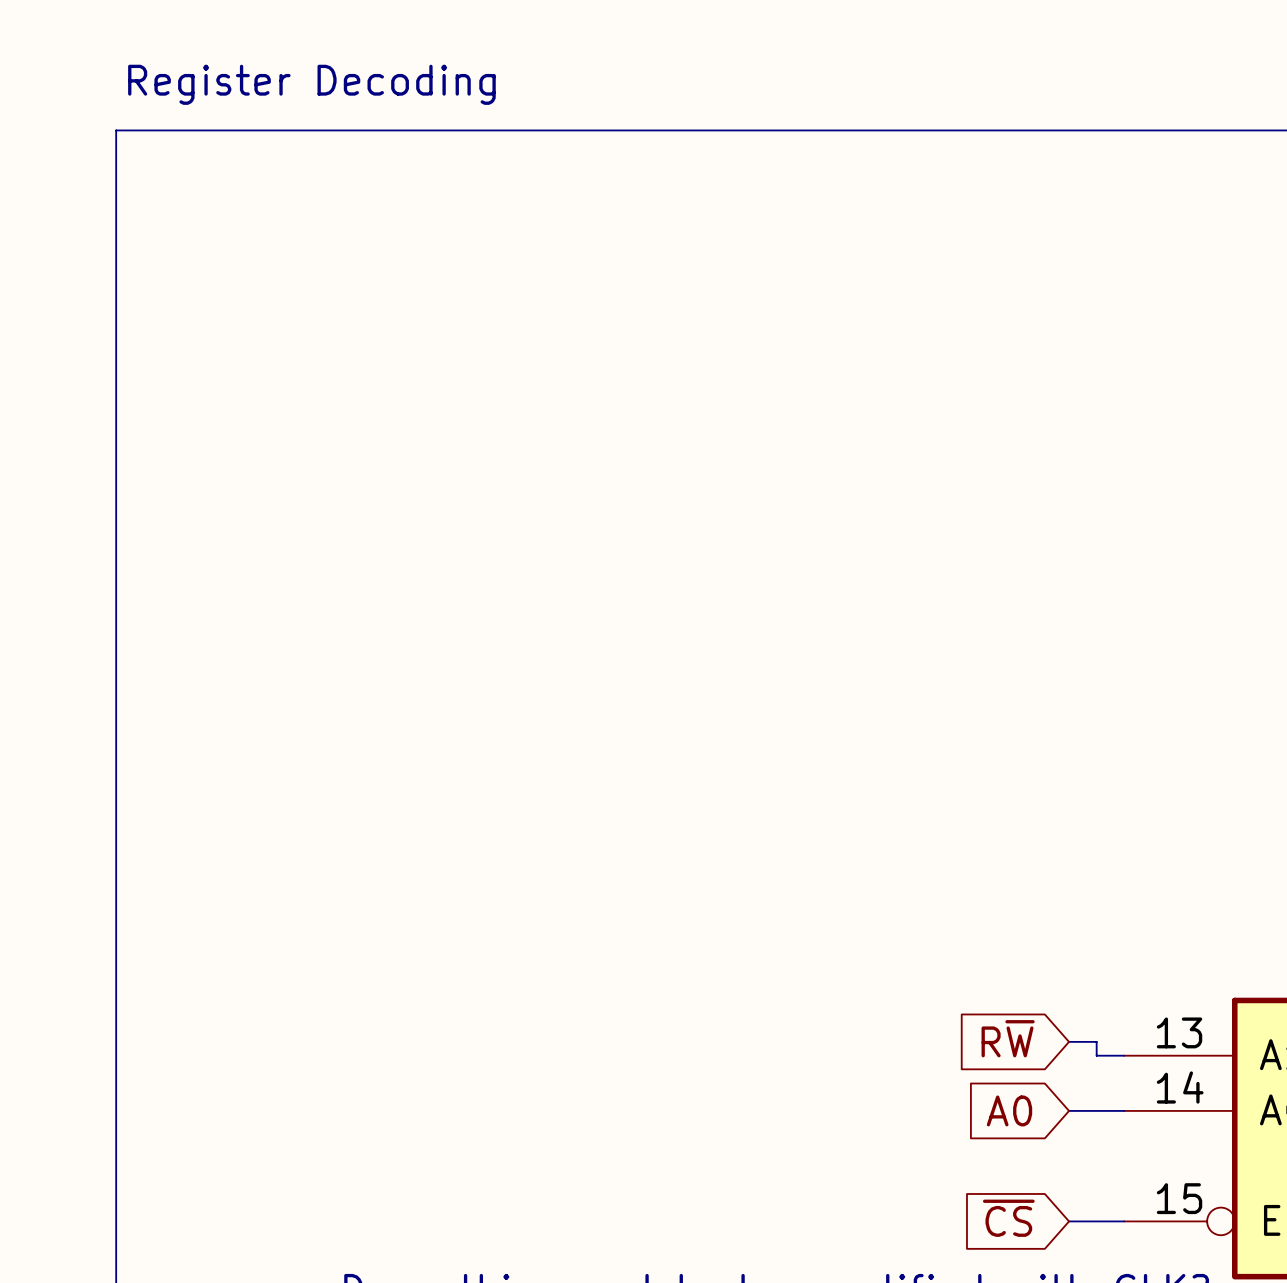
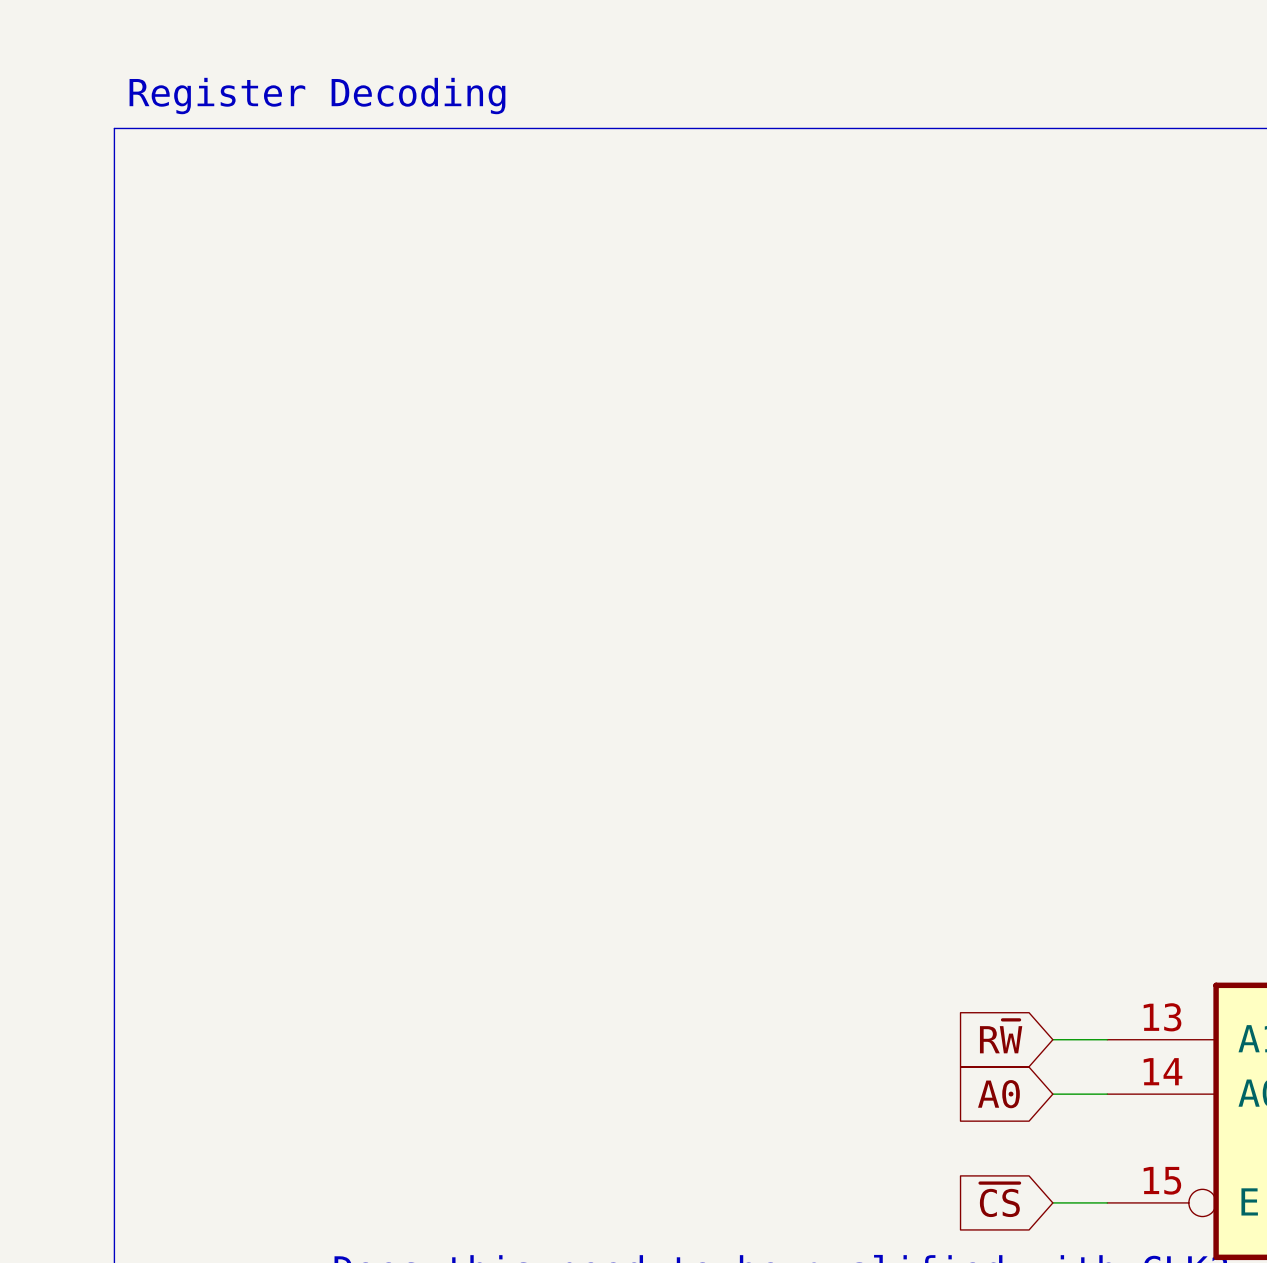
text position: Register Decoding (311, 84) -> Register Decoding (317, 96)
global label position: R~{W} (1008, 1038) -> R~{W} (1001, 1036)
wire: (1069, 1041) (1096, 1041) (1096, 1055) -> (1052, 1039) (1080, 1039)

